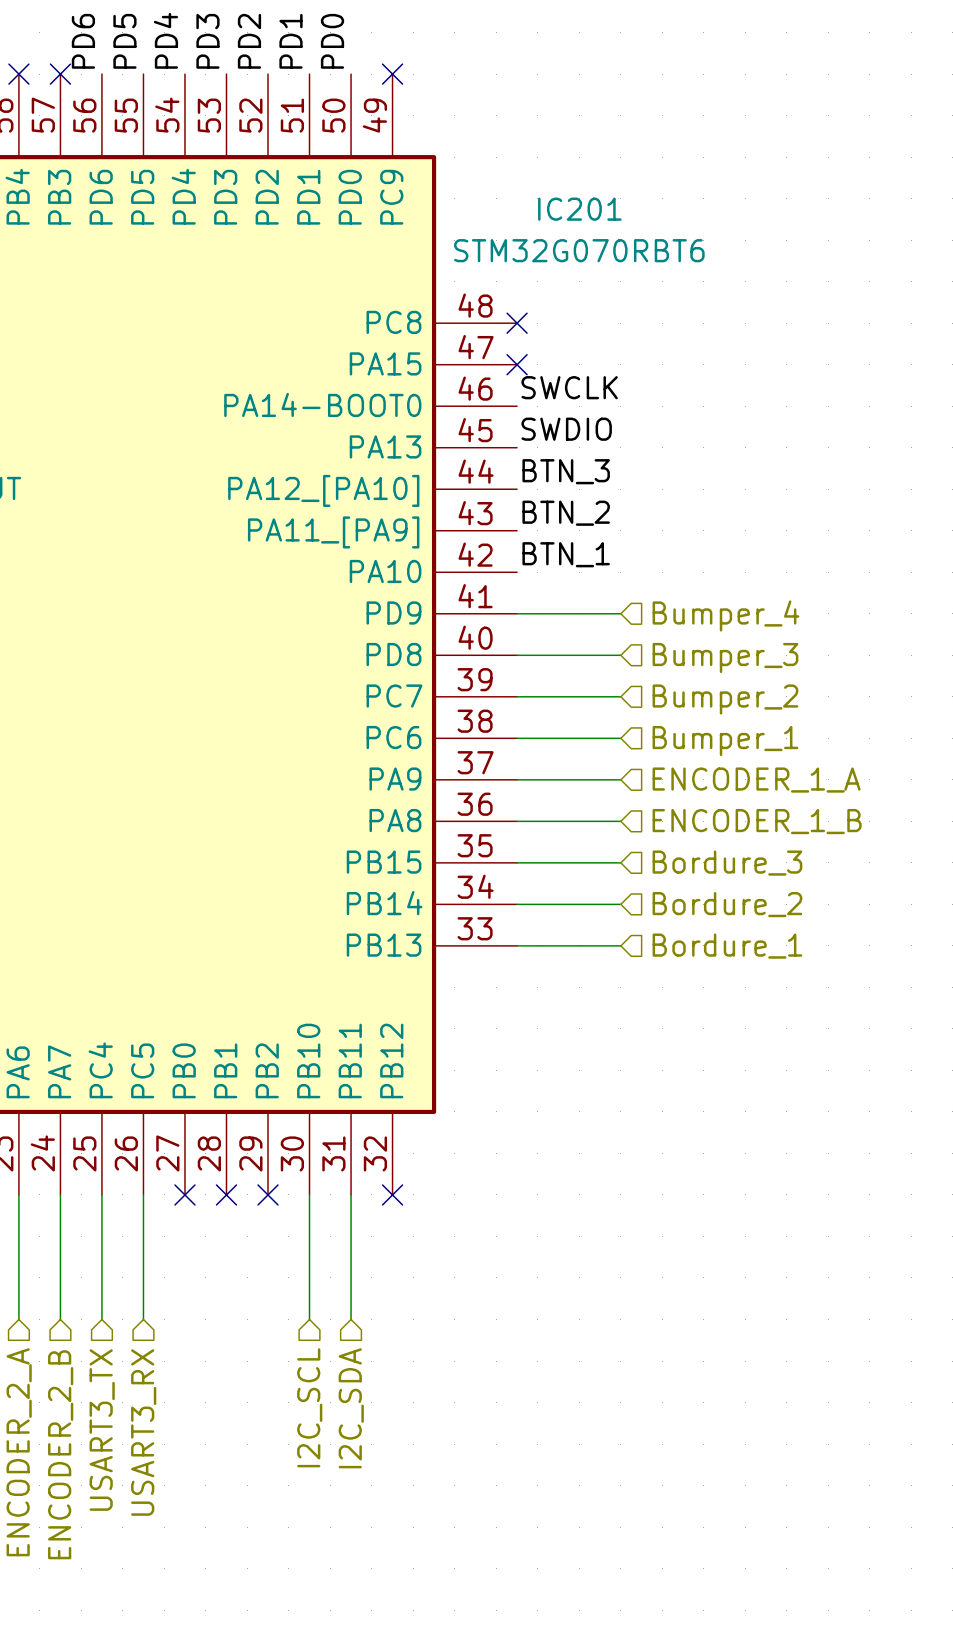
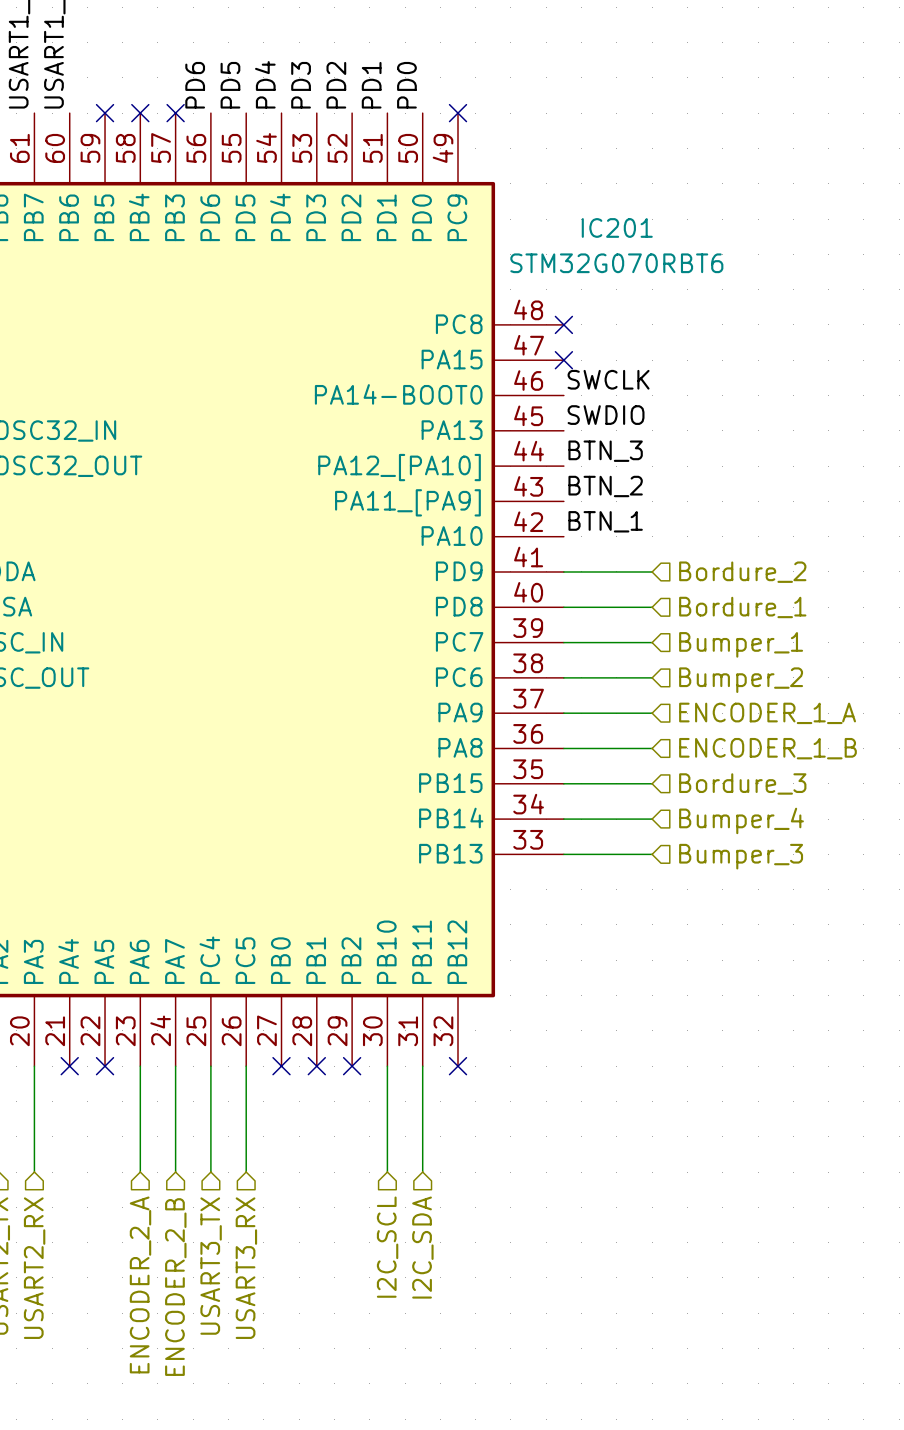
hierarchical label: Bumper_4 (725, 615) -> Bordure_2 (742, 572)
hierarchical label: Bumper_3 (725, 657) -> Bordure_1 (742, 607)
hierarchical label: Bumper_2 (725, 699) -> Bumper_1 (741, 644)
hierarchical label: Bumper_1 (725, 741) -> Bumper_2 (741, 680)
hierarchical label: Bordure_2 (727, 904) -> Bumper_4 (741, 820)
hierarchical label: Bordure_1 (727, 946) -> Bumper_3 (741, 856)

